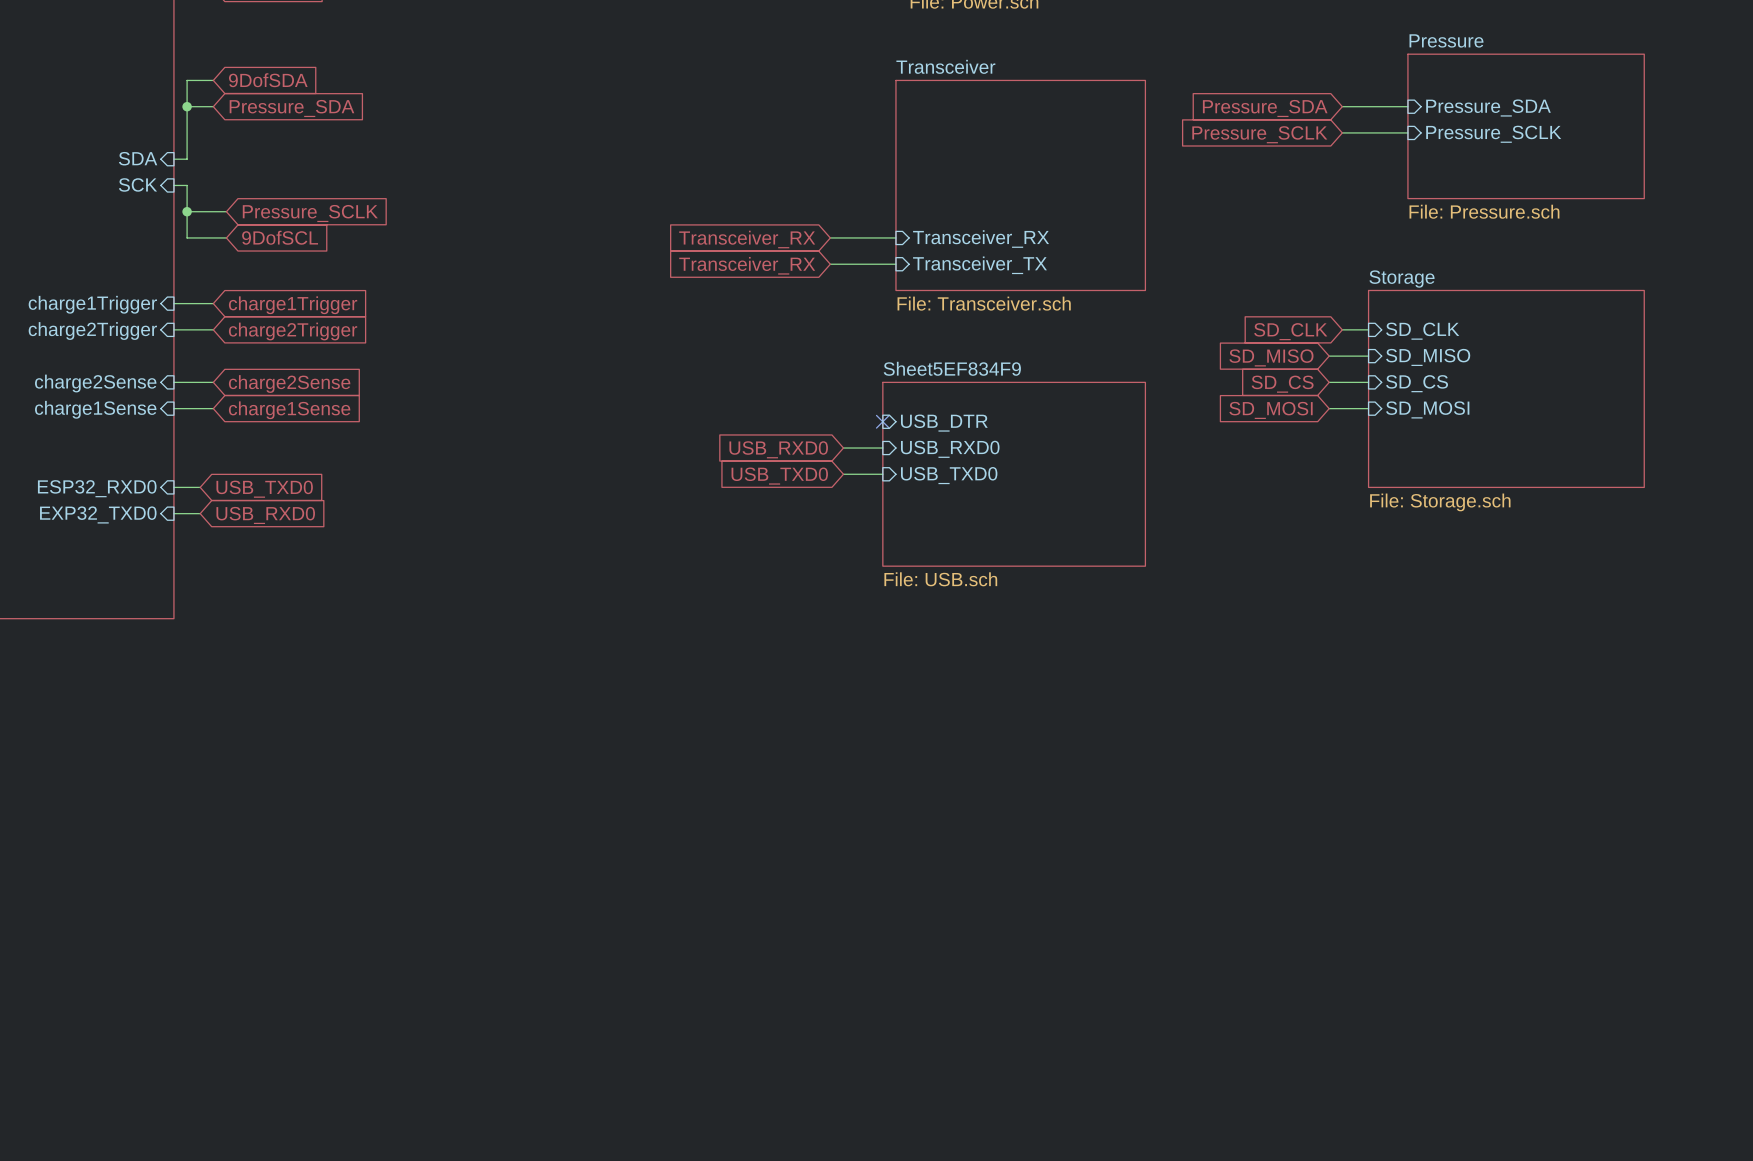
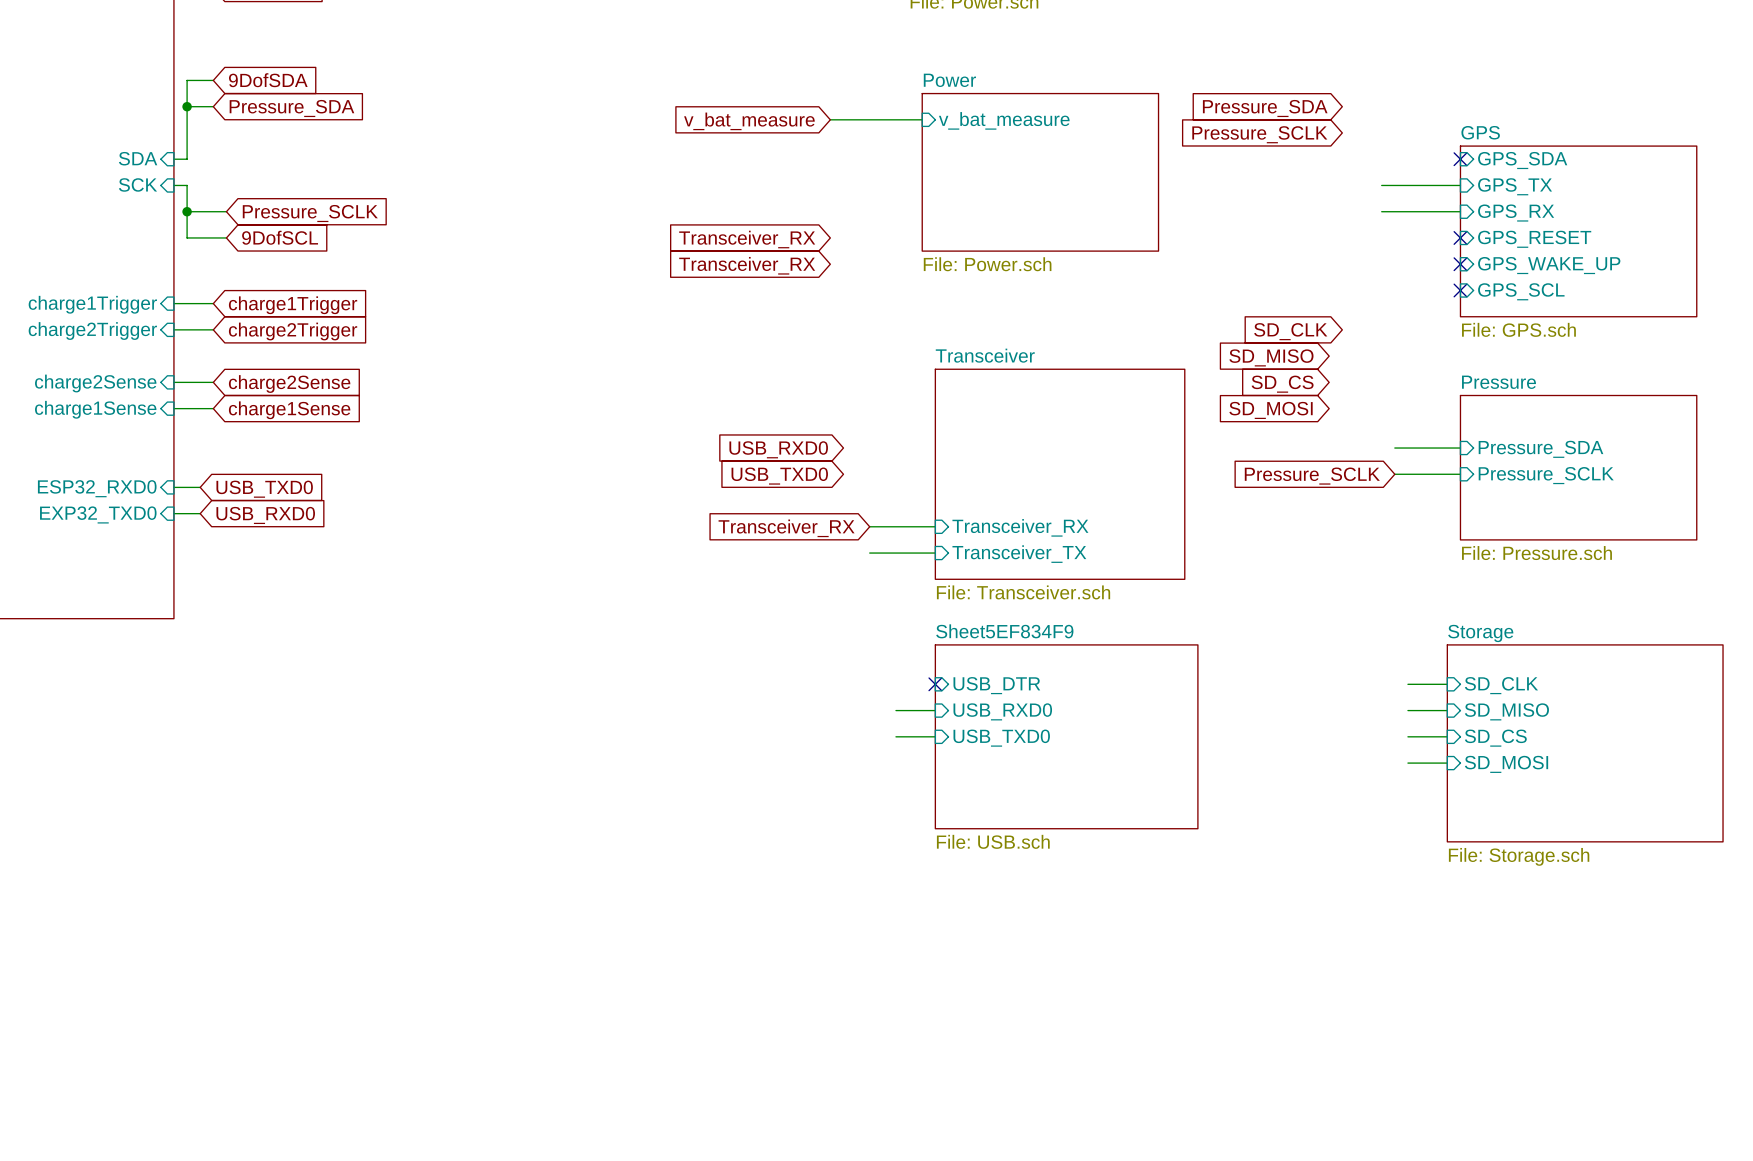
wire: (1342, 106) (1407, 106) -> none
sheet pin: Pressure_SDA (1488, 108) -> none
wire: none -> (830, 119) (922, 119)
sheet pin: none -> v_bat_measure (1004, 120)
global label: none -> v_bat_measure (749, 121)
sheet Pressure: File: Pressure.sch (1526, 126) -> none
wire: (1342, 132) (1407, 132) -> none
sheet pin: Pressure_SCLK (1493, 134) -> none
no-connect mark: none -> (1460, 159)
sheet pin: none -> GPS_SDA (1522, 160)
sheet Power: none -> File: Power.sch (1040, 172)
sheet Transceiver: File: Transceiver.sch (1020, 185) -> none
wire: none -> (1381, 185) (1460, 185)
sheet pin: none -> GPS_TX (1515, 186)
wire: none -> (1381, 211) (1460, 211)
sheet pin: none -> GPS_RX (1516, 213)
sheet GPS: none -> File: GPS.sch (1578, 231)
wire: (830, 237) (895, 237) -> none
no-connect mark: none -> (1460, 237)
sheet pin: Transceiver_RX (981, 239) -> none
sheet pin: none -> GPS_RESET (1534, 239)
wire: (830, 264) (895, 264) -> none
no-connect mark: none -> (1460, 264)
sheet pin: Transceiver_TX (979, 265) -> none
sheet pin: none -> GPS_WAKE_UP (1549, 265)
no-connect mark: none -> (1460, 290)
sheet pin: none -> GPS_SCL (1521, 291)
wire: (1342, 329) (1368, 329) -> none
sheet pin: SD_CLK (1422, 331) -> none
wire: (1329, 356) (1368, 356) -> none
sheet pin: SD_MISO (1428, 357) -> none
wire: (1329, 382) (1368, 382) -> none
sheet pin: SD_CS (1417, 383) -> none
sheet Storage: File: Storage.sch (1506, 388) -> none
wire: (1329, 408) (1368, 408) -> none
sheet pin: SD_MOSI (1427, 409) -> none
no-connect mark: (882, 421) -> none
sheet pin: USB_DTR (944, 423) -> none
wire: (843, 448) (882, 448) -> none
wire: none -> (1394, 448) (1460, 448)
sheet pin: USB_RXD0 (950, 449) -> none
sheet pin: none -> Pressure_SDA (1541, 449)
sheet Pressure: none -> File: Pressure.sch (1578, 467)
wire: (843, 474) (882, 474) -> (895, 710) (935, 710)
sheet Sheet5EF834F9 position: (1014, 474) -> (1066, 736)
sheet Transceiver: none -> File: Transceiver.sch (1060, 474)
wire: none -> (1394, 474) (1460, 474)
sheet pin: USB_TXD0 (949, 475) -> none
sheet pin: none -> Pressure_SCLK (1546, 475)
global label: none -> Pressure_SCLK (1312, 476)
wire: none -> (869, 526) (935, 526)
sheet pin: none -> Transceiver_RX (1020, 527)
global label: none -> Transceiver_RX (786, 528)
wire: none -> (869, 553) (935, 553)
sheet pin: none -> Transceiver_TX (1019, 554)
no-connect mark: none -> (935, 684)
wire: none -> (1407, 684) (1447, 684)
sheet pin: none -> USB_DTR (996, 685)
sheet pin: none -> SD_CLK (1501, 685)
wire: none -> (1407, 710) (1447, 710)
sheet pin: none -> USB_RXD0 (1002, 711)
sheet pin: none -> SD_MISO (1506, 711)
wire: none -> (895, 736) (935, 736)
wire: none -> (1407, 736) (1447, 736)
sheet pin: none -> USB_TXD0 (1001, 738)
sheet pin: none -> SD_CS (1495, 738)
sheet Storage: none -> File: Storage.sch (1585, 743)
wire: none -> (1407, 763) (1447, 763)
sheet pin: none -> SD_MOSI (1506, 764)

